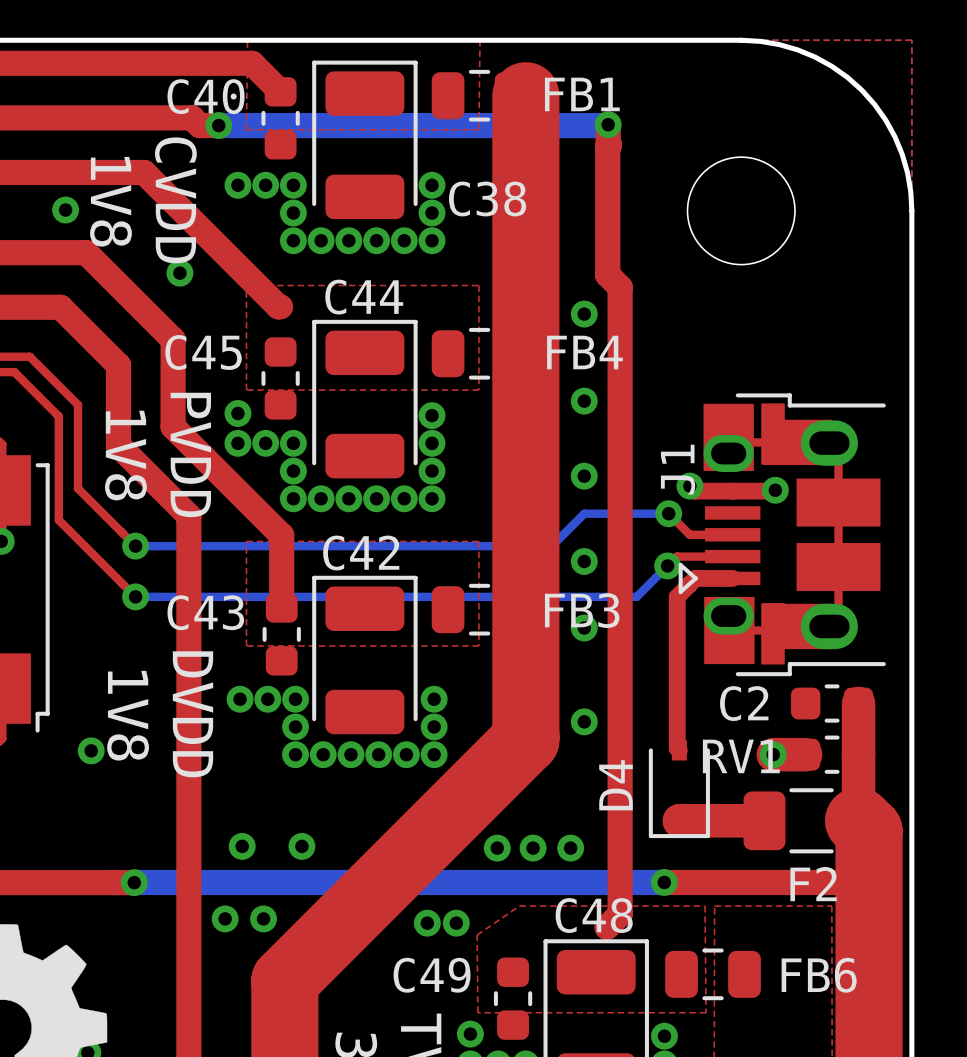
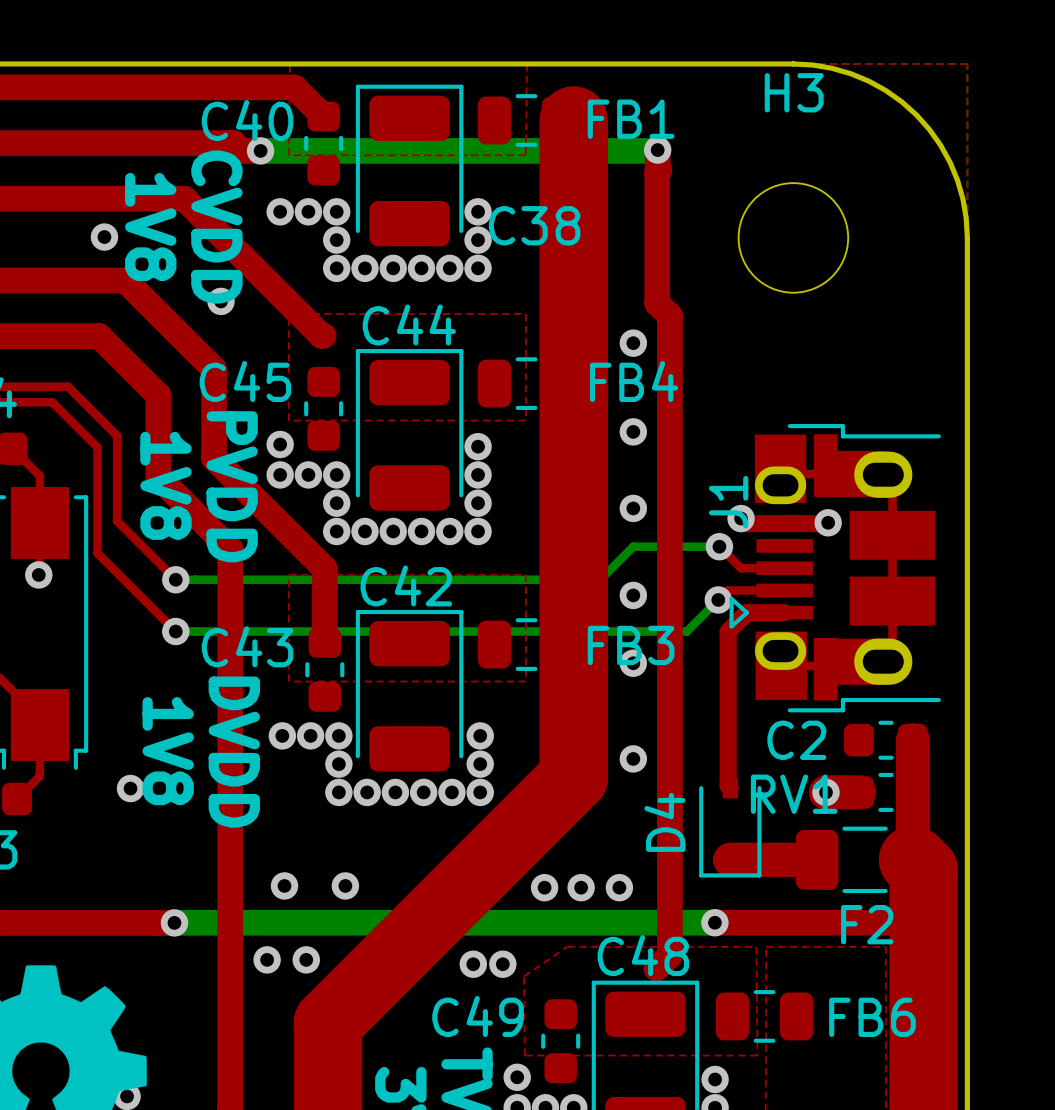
H3 name: none -> H3 (794, 92)

